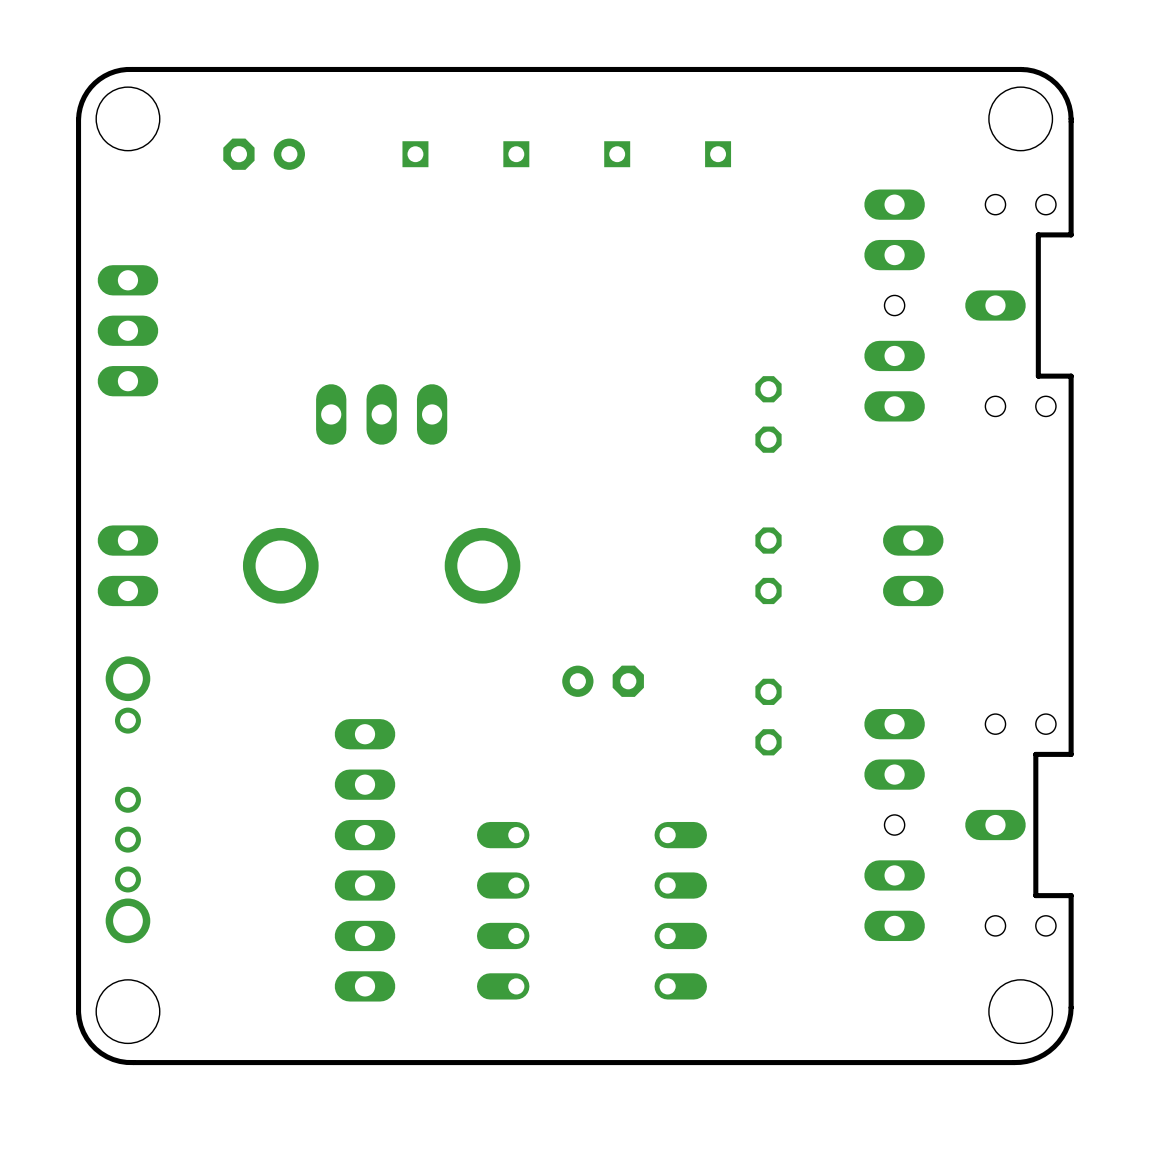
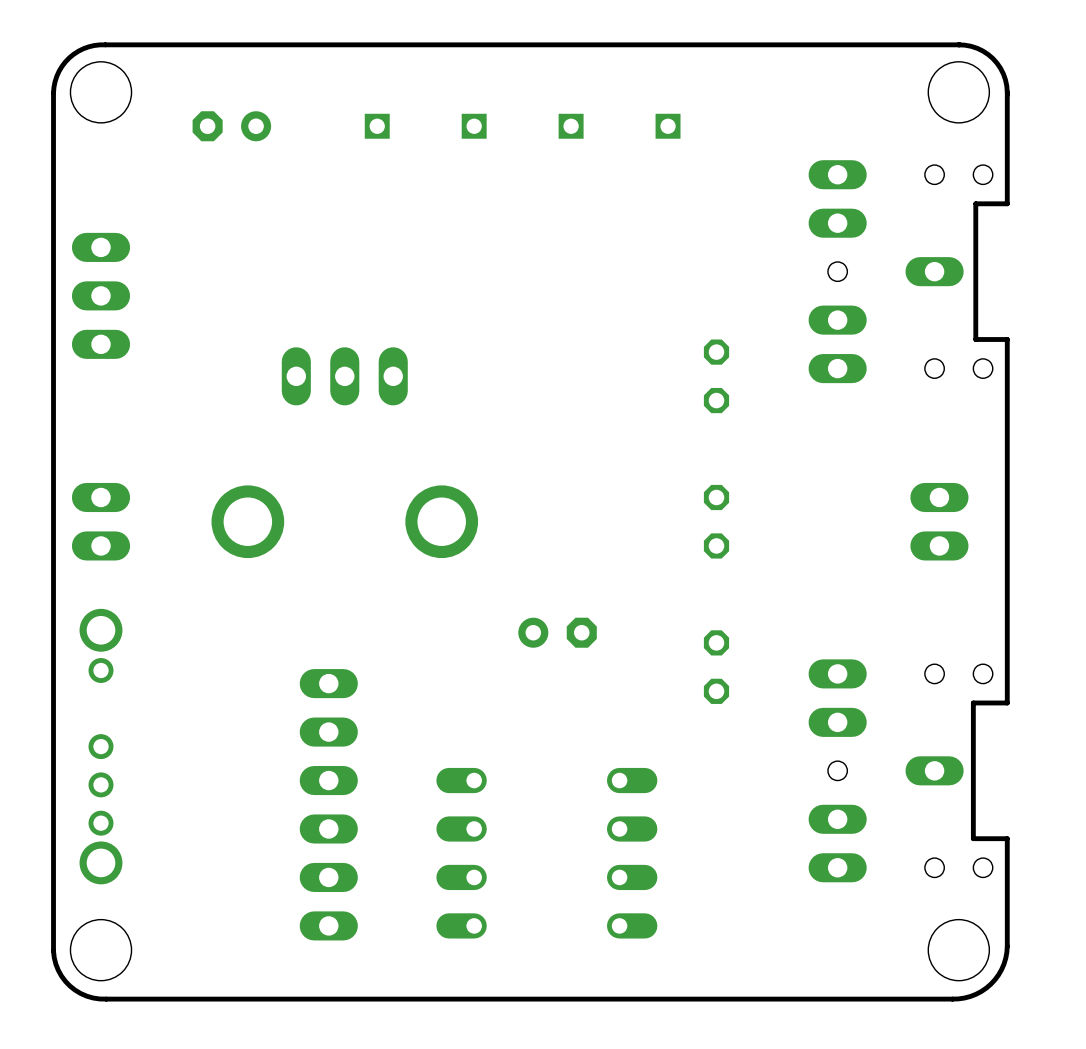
part position: (913, 565) -> (939, 521)

